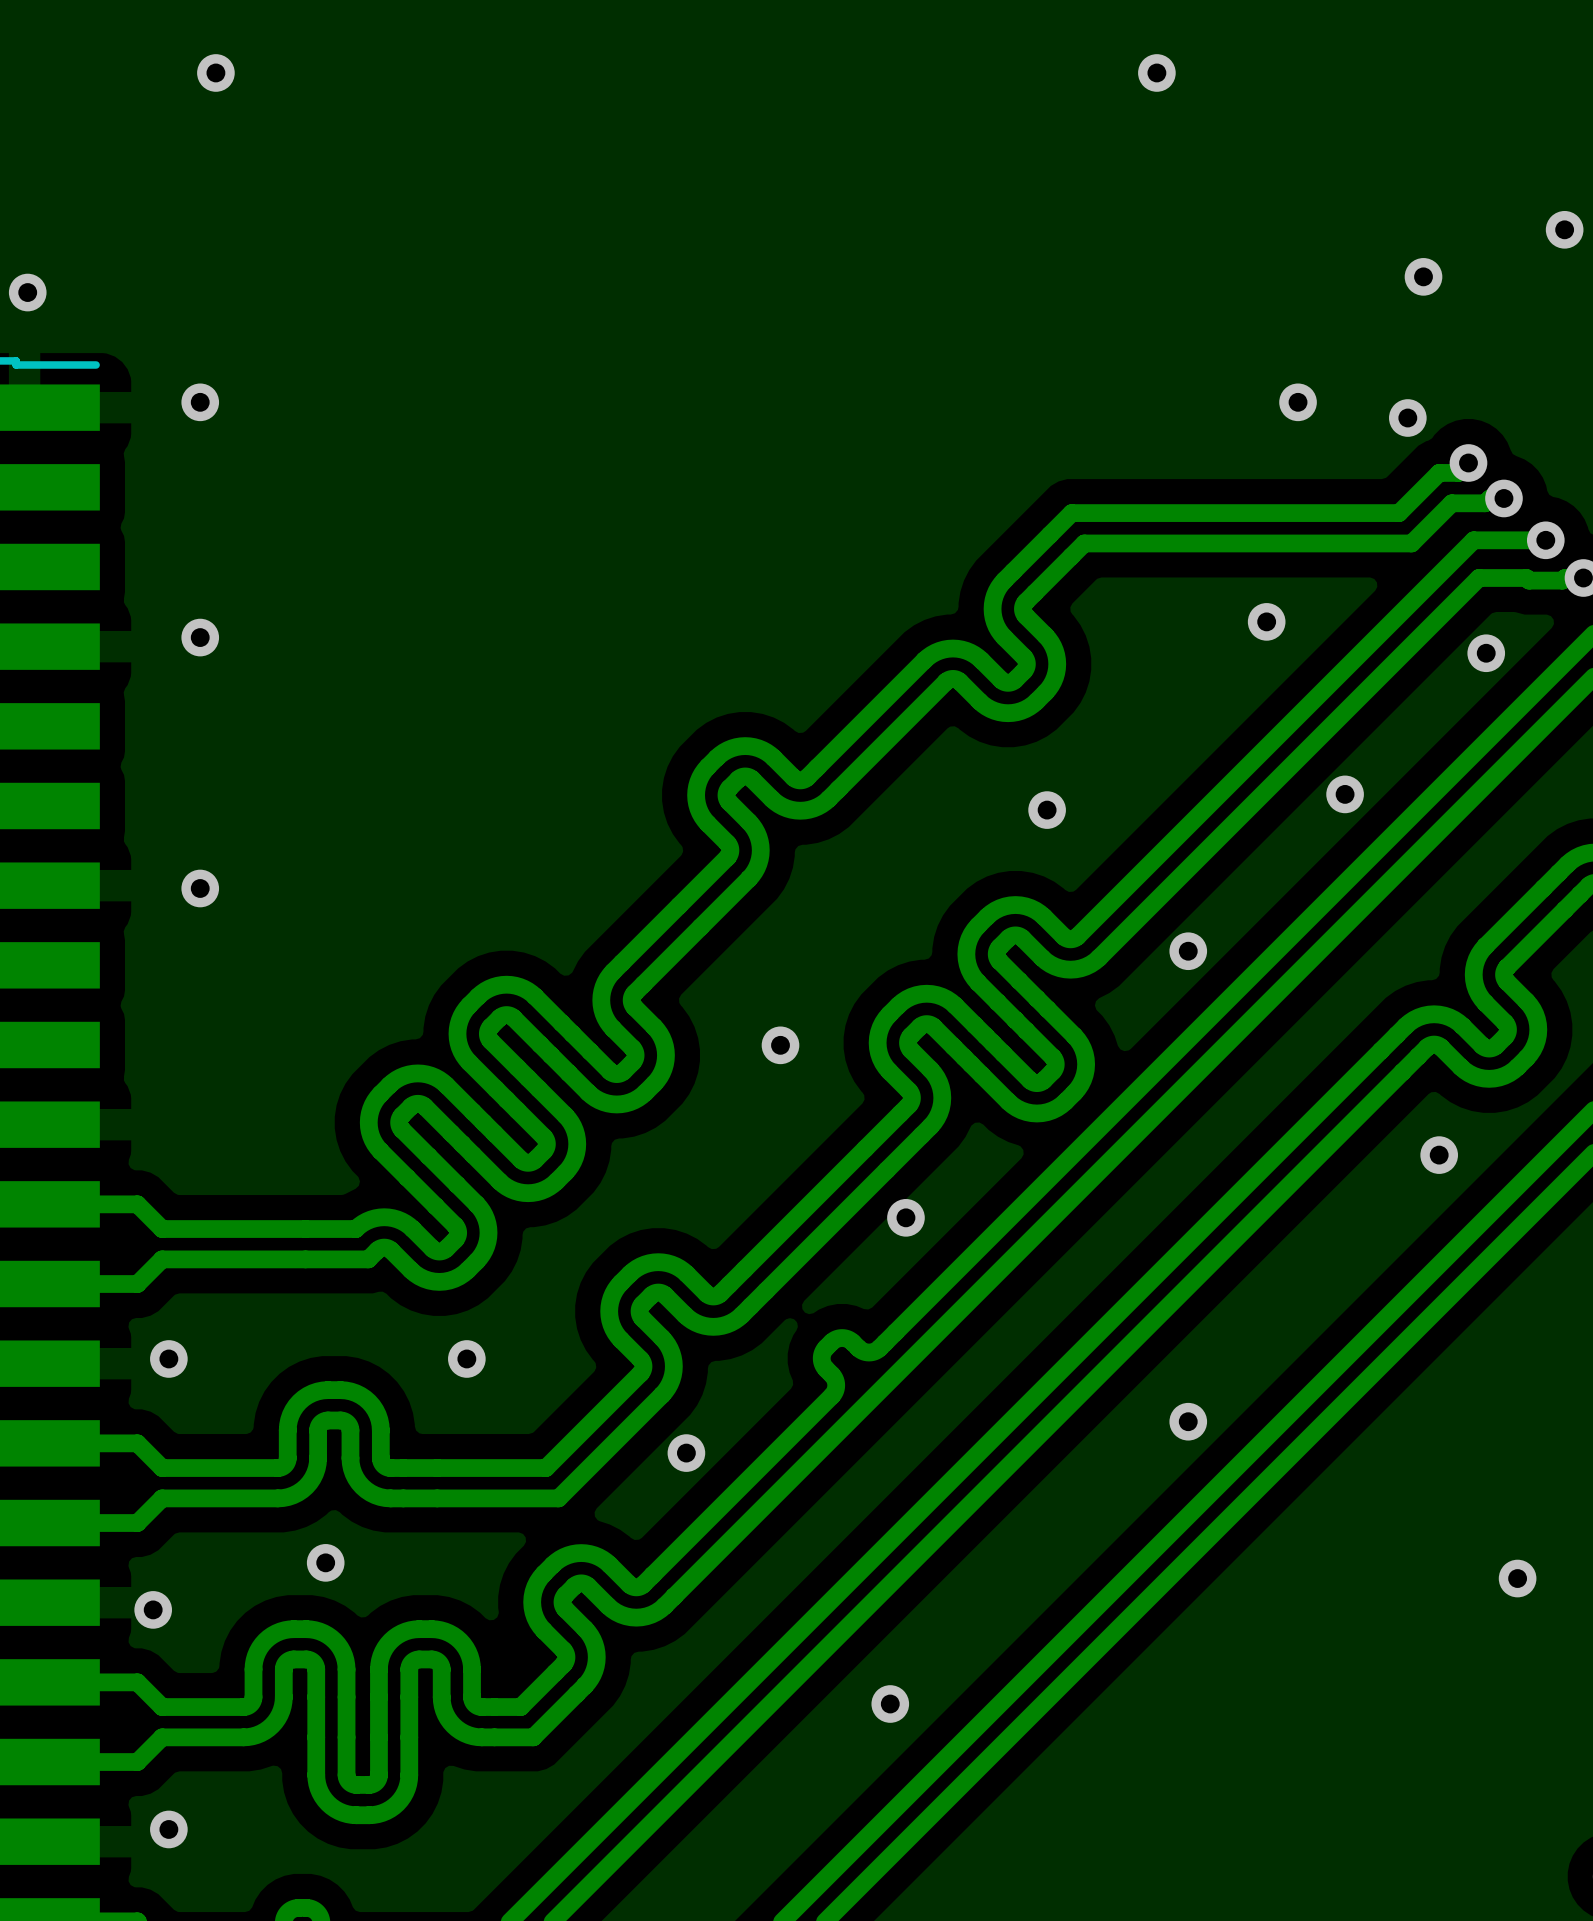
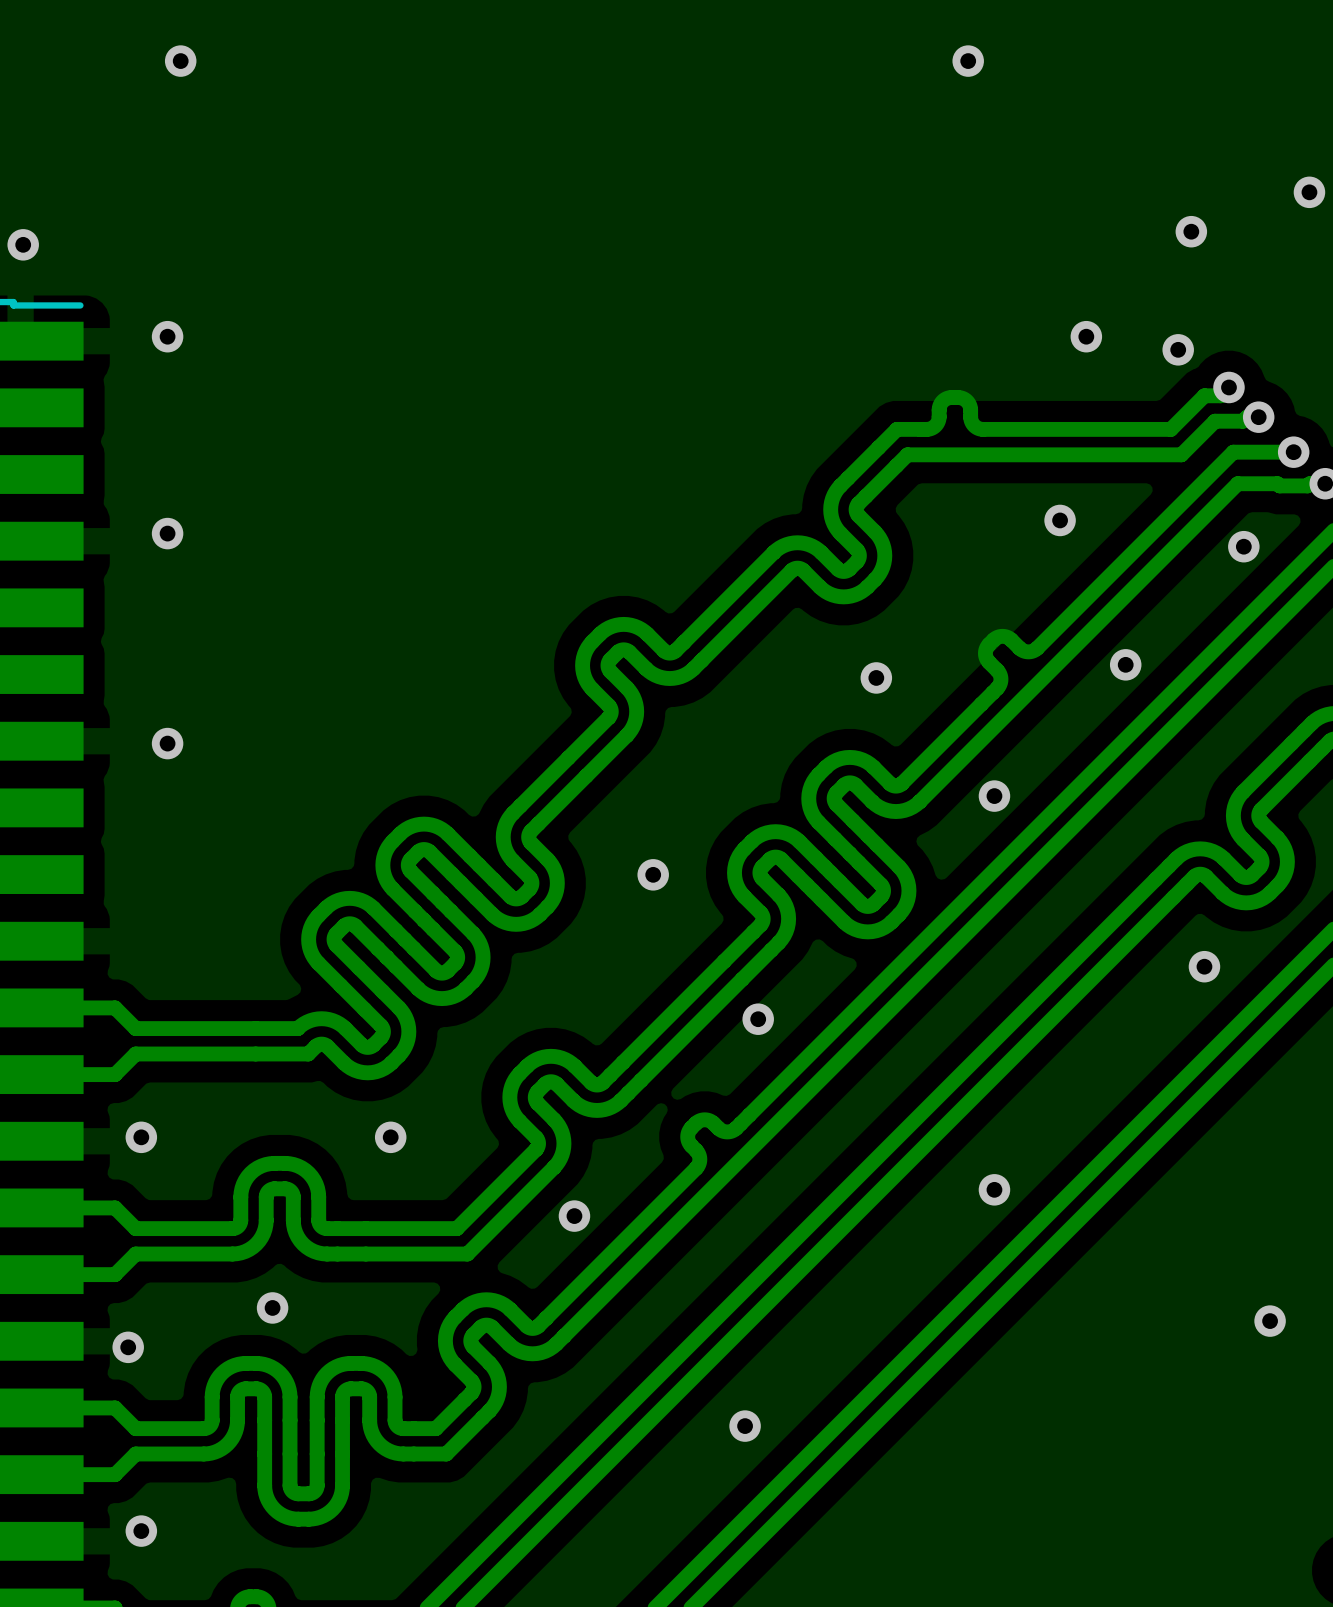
track: (1174, 513) (1107, 513) -> (983, 429) (976, 427) (972, 423) (967, 402) (958, 397) (948, 397) (942, 401) (939, 407) (937, 423) (933, 427) (926, 429)
track: (1239, 774) (1191, 822) -> (1037, 648) (1031, 651) (1023, 650) (1010, 638) (1004, 636) (996, 638) (989, 644) (985, 651) (986, 658) (998, 671) (1000, 677) (997, 688)

